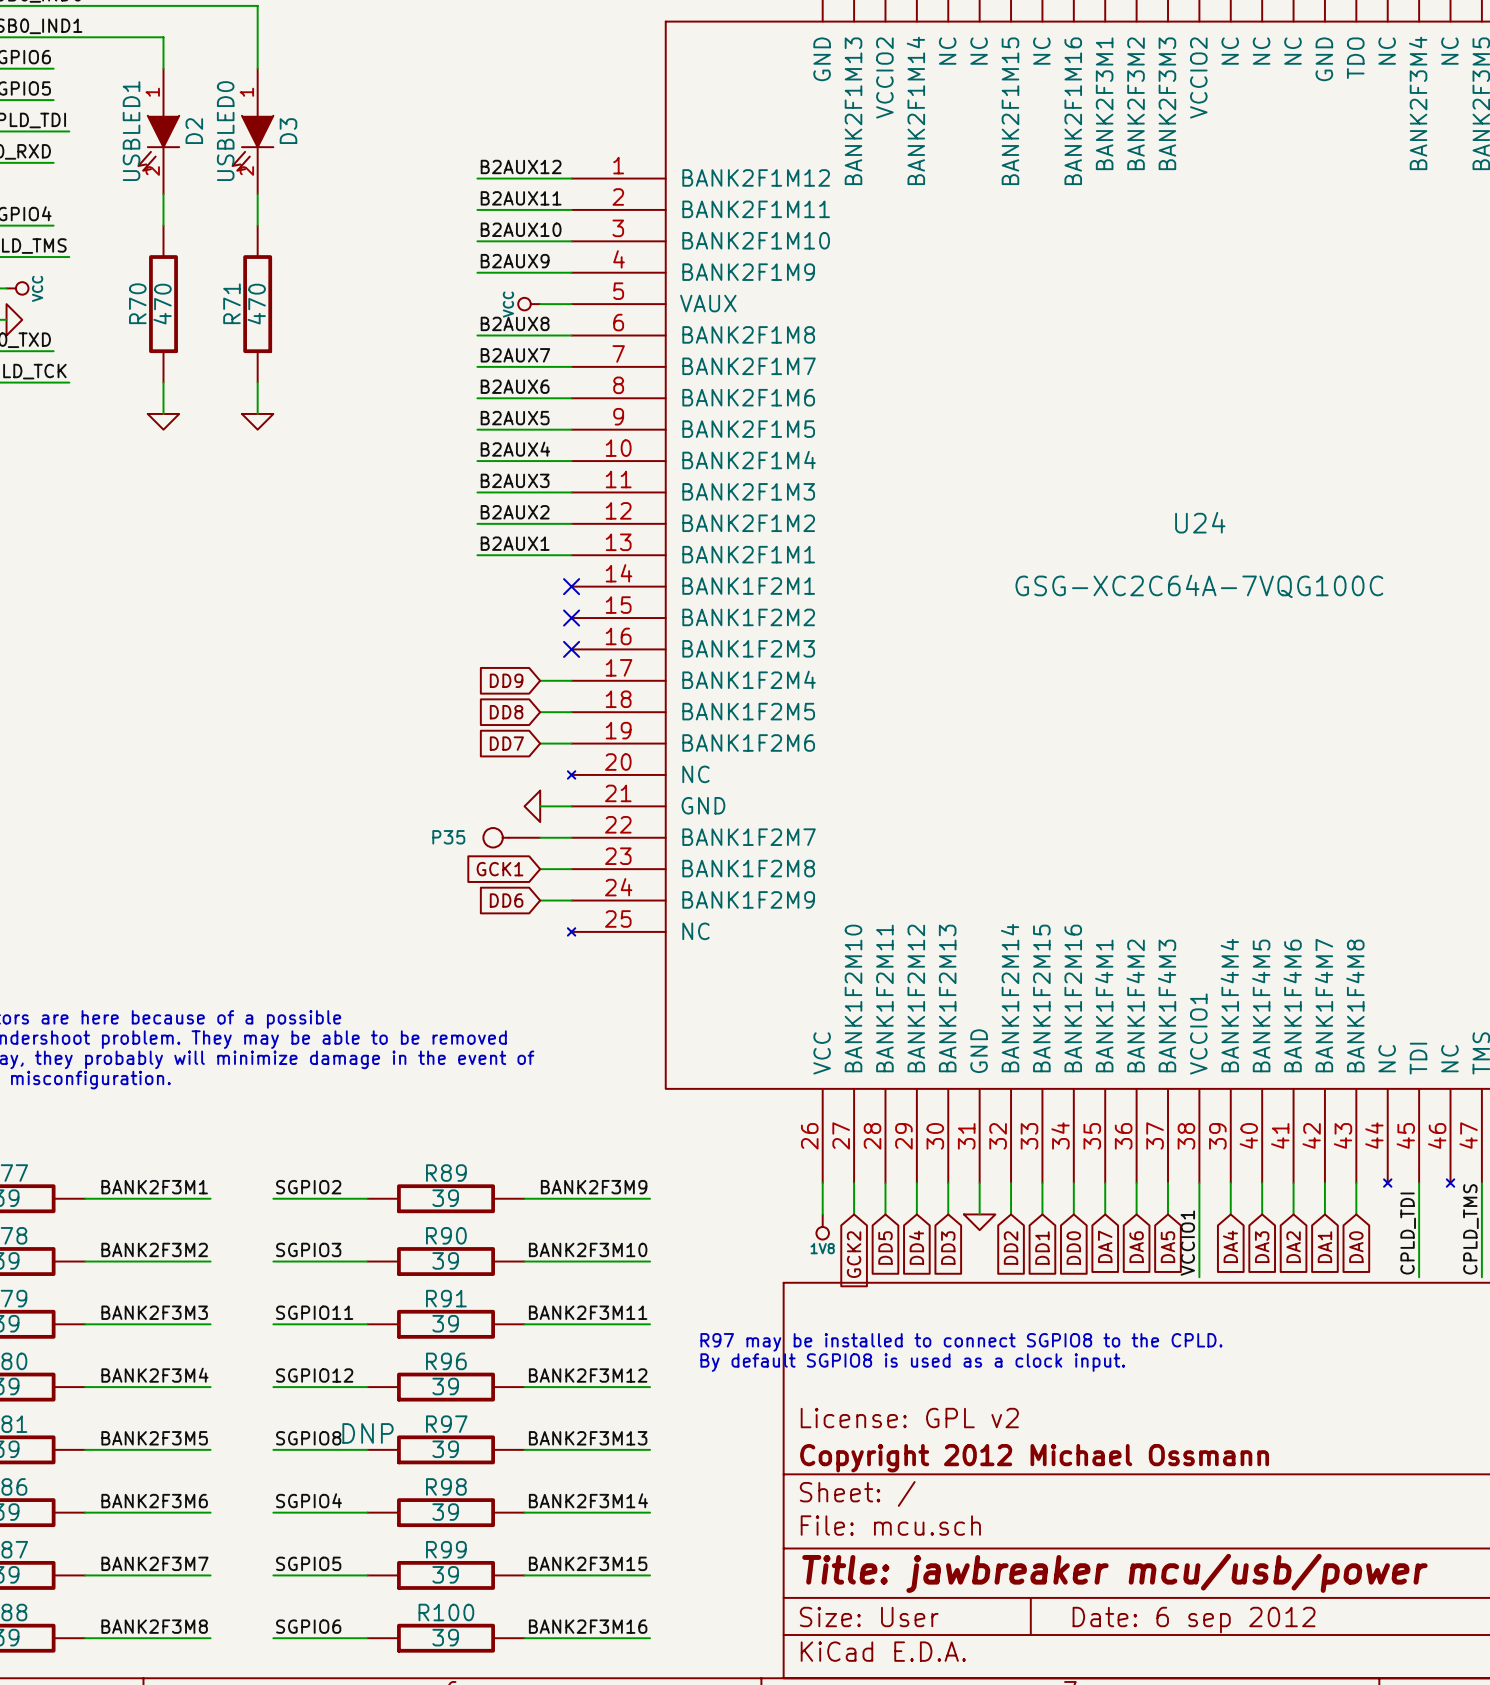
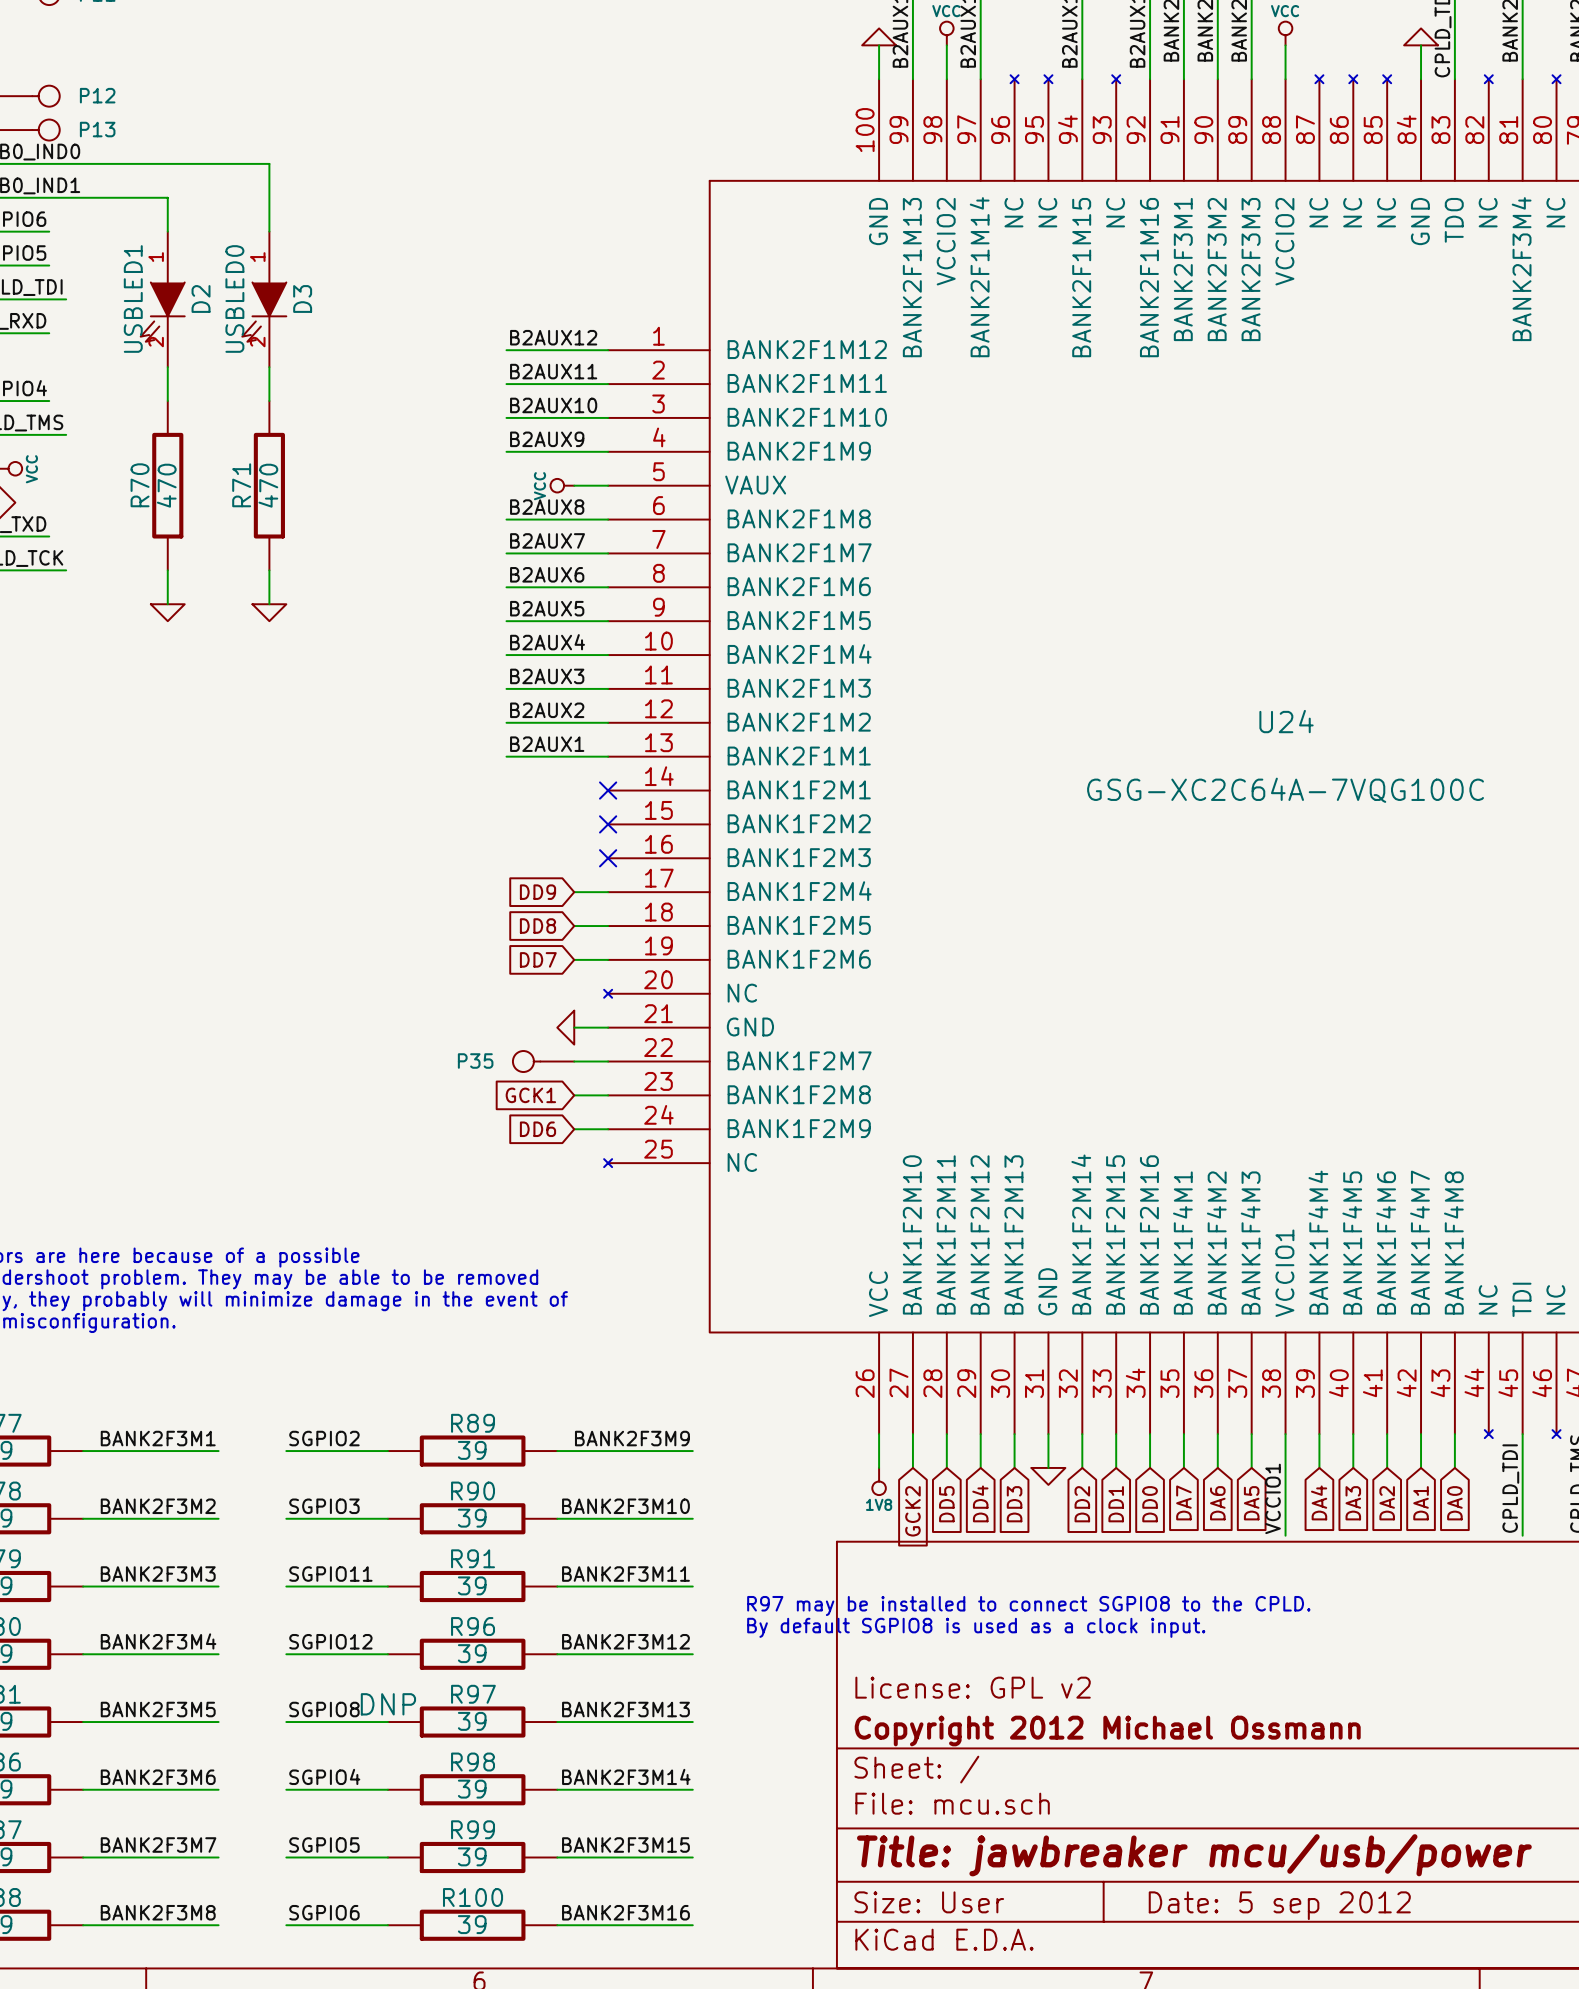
title block: Date: 6 sep 2012 (1194, 1620) -> Date: 5 sep 2012 (1279, 1905)

